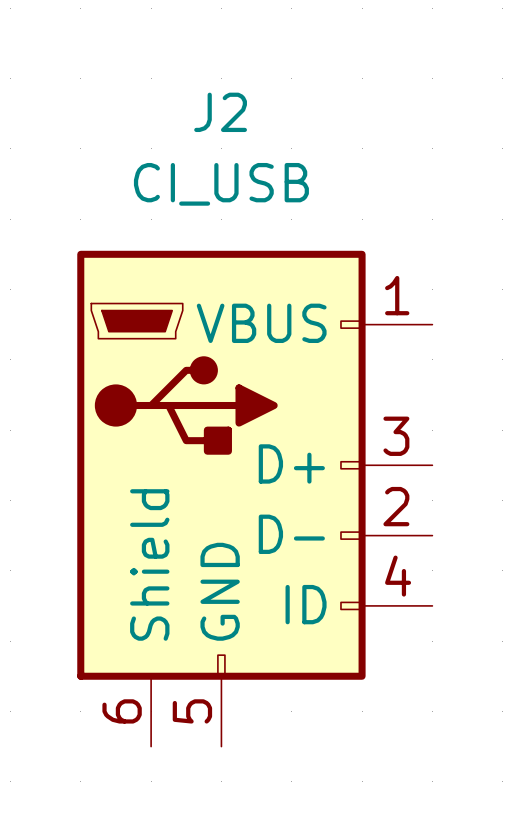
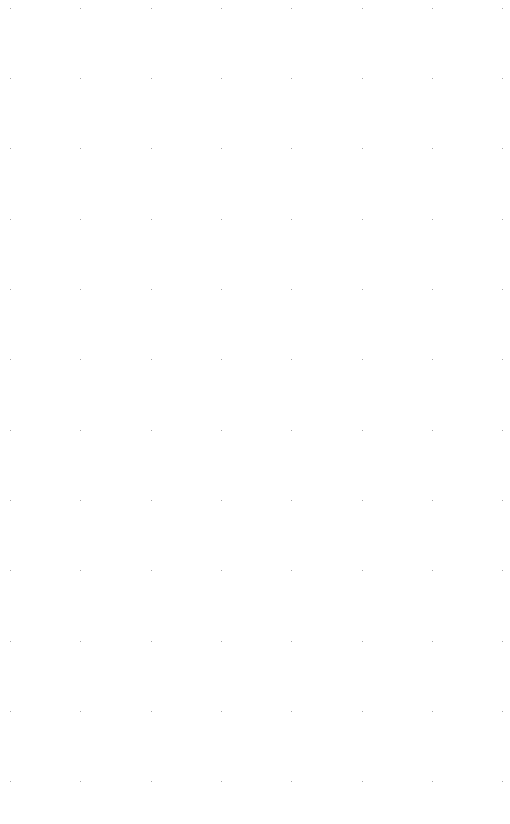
J2: CI_USB (254, 498) -> none

